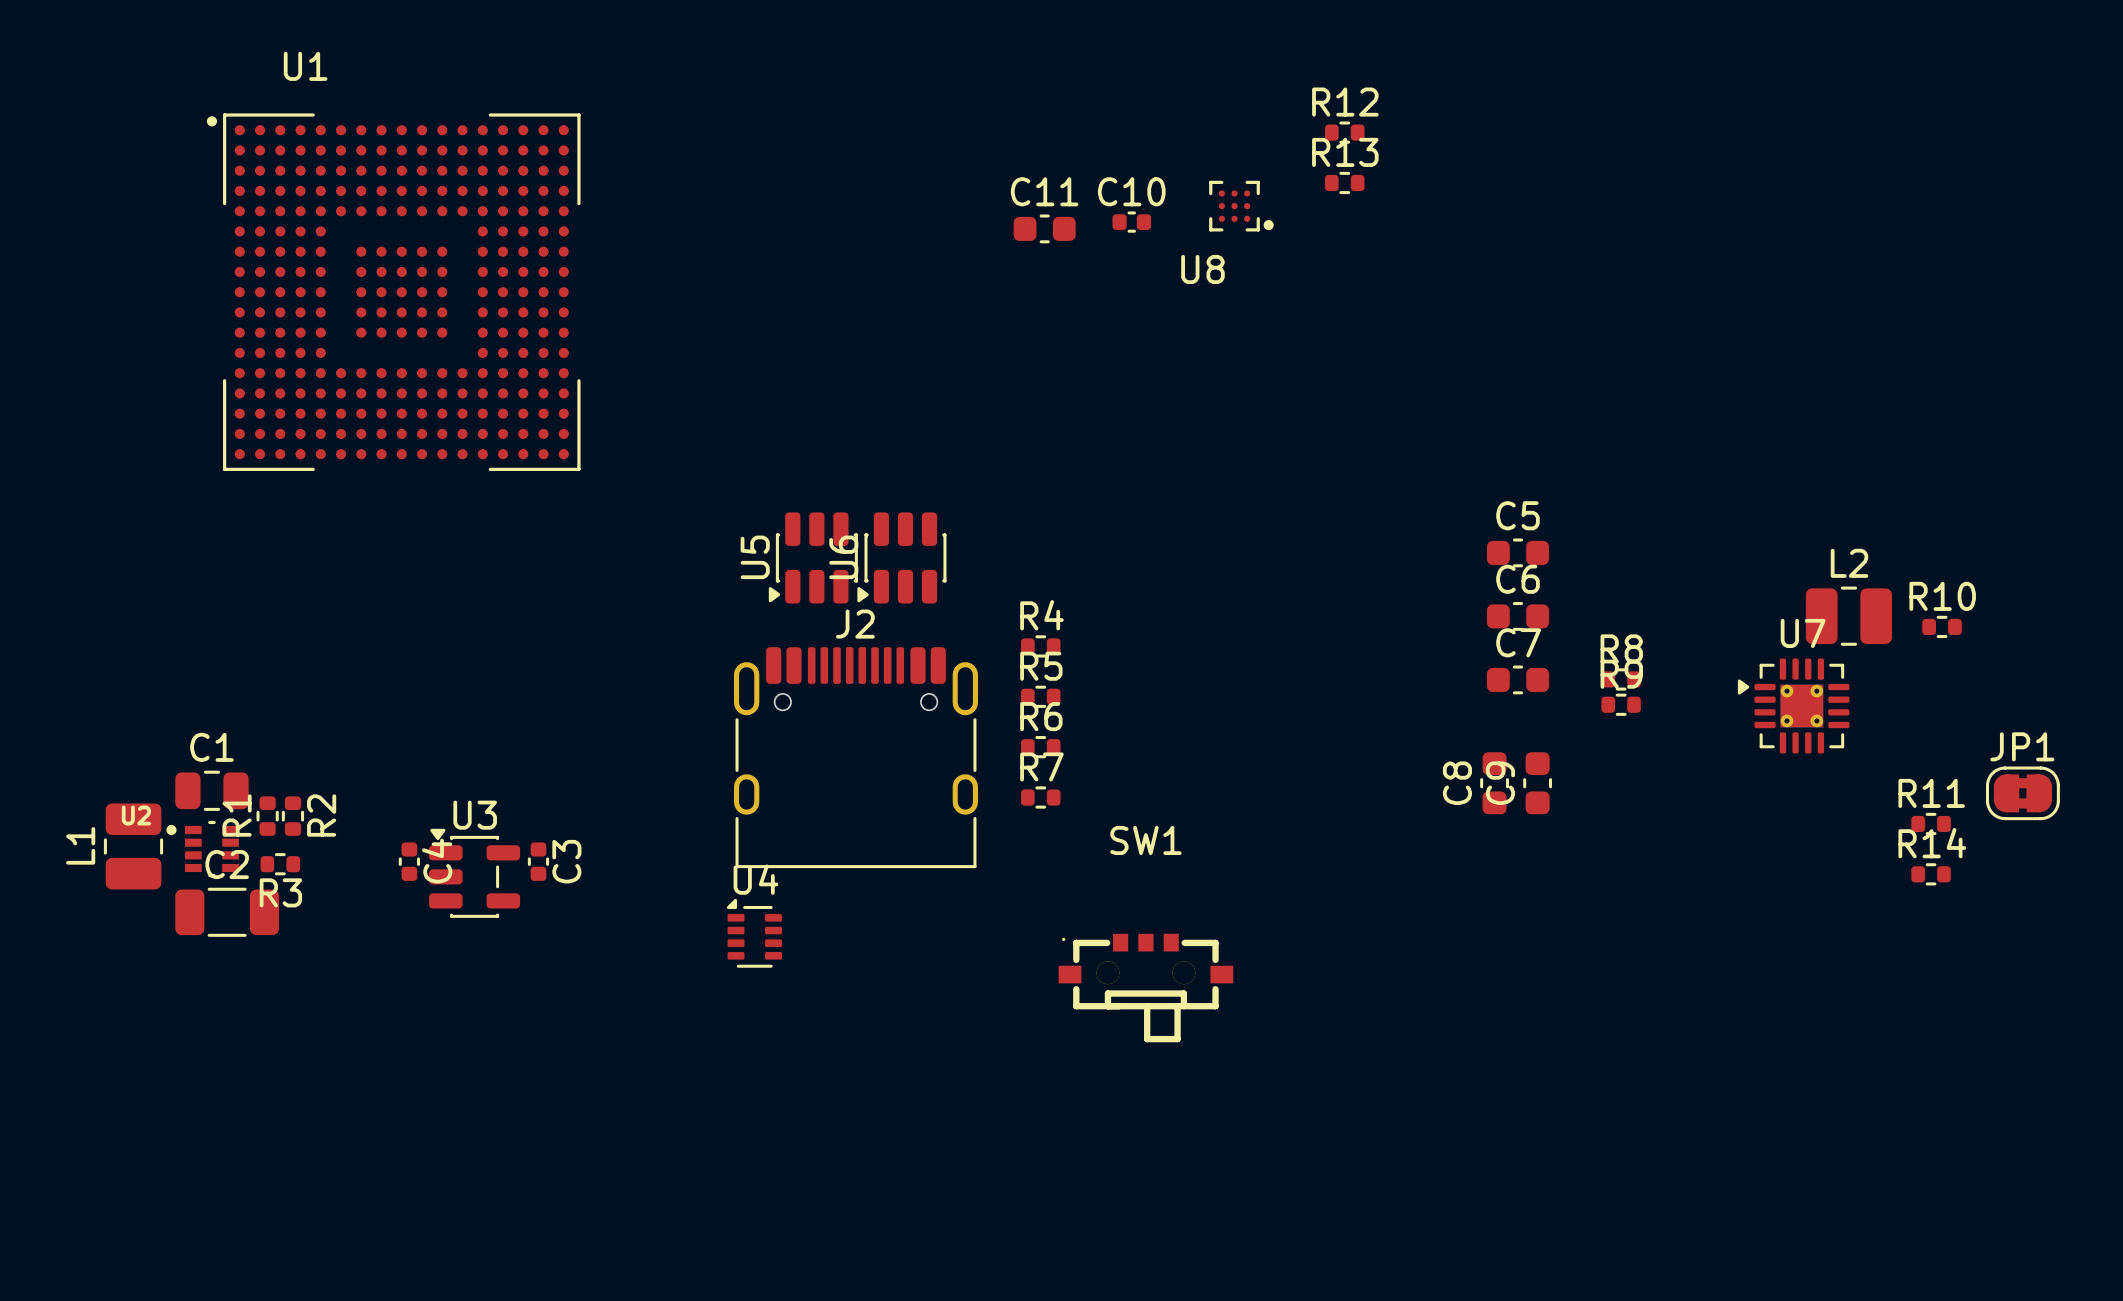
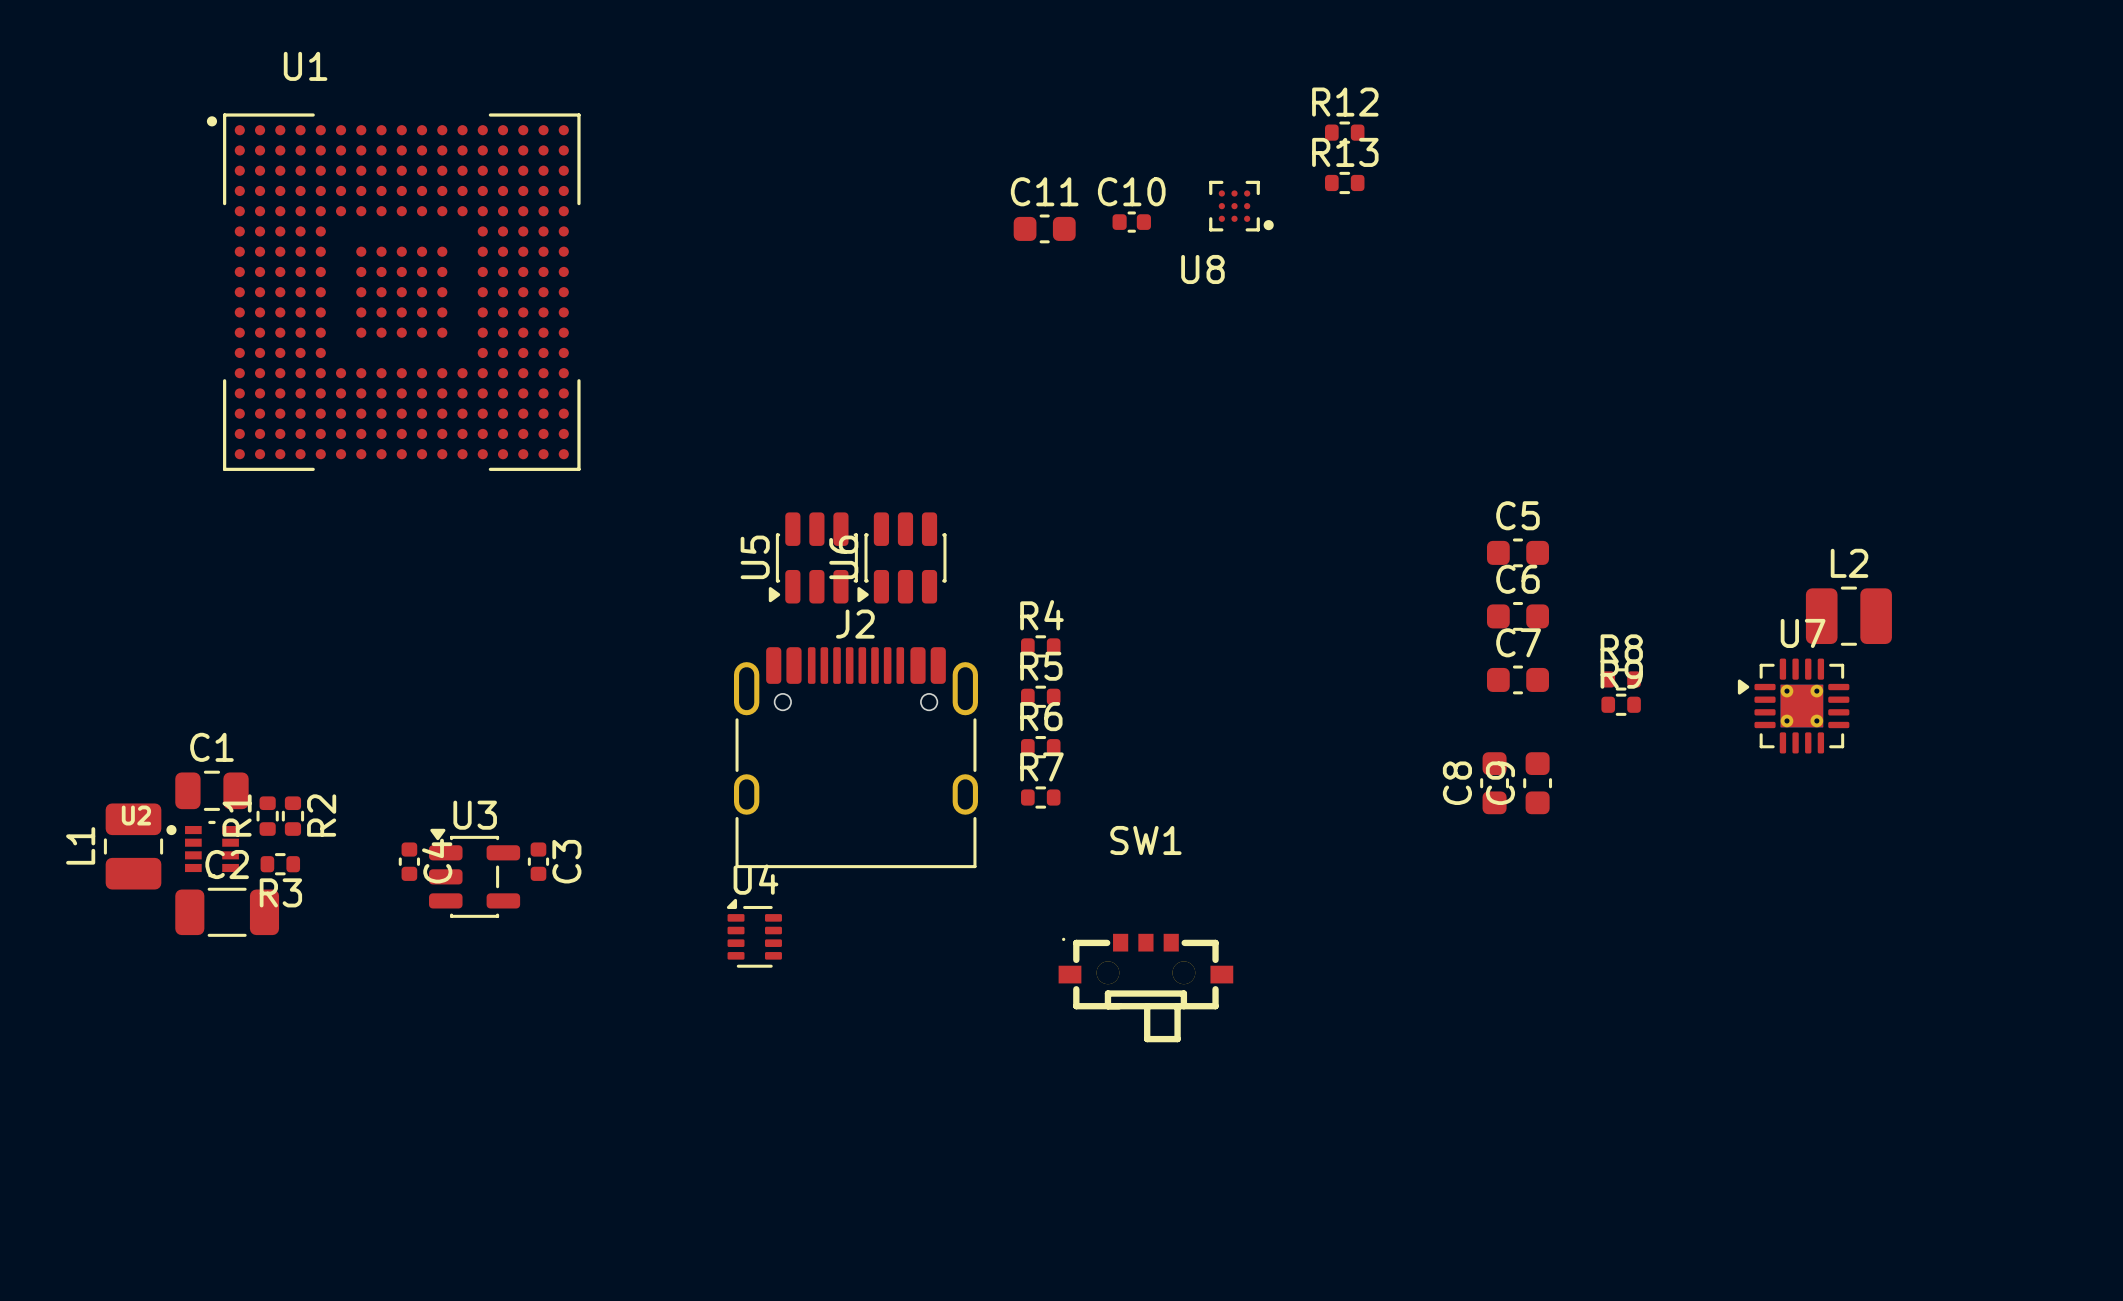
R10: (1942, 626) -> none
JP1: (2022, 793) -> none
R11: (1931, 823) -> none
R14: (1931, 874) -> none

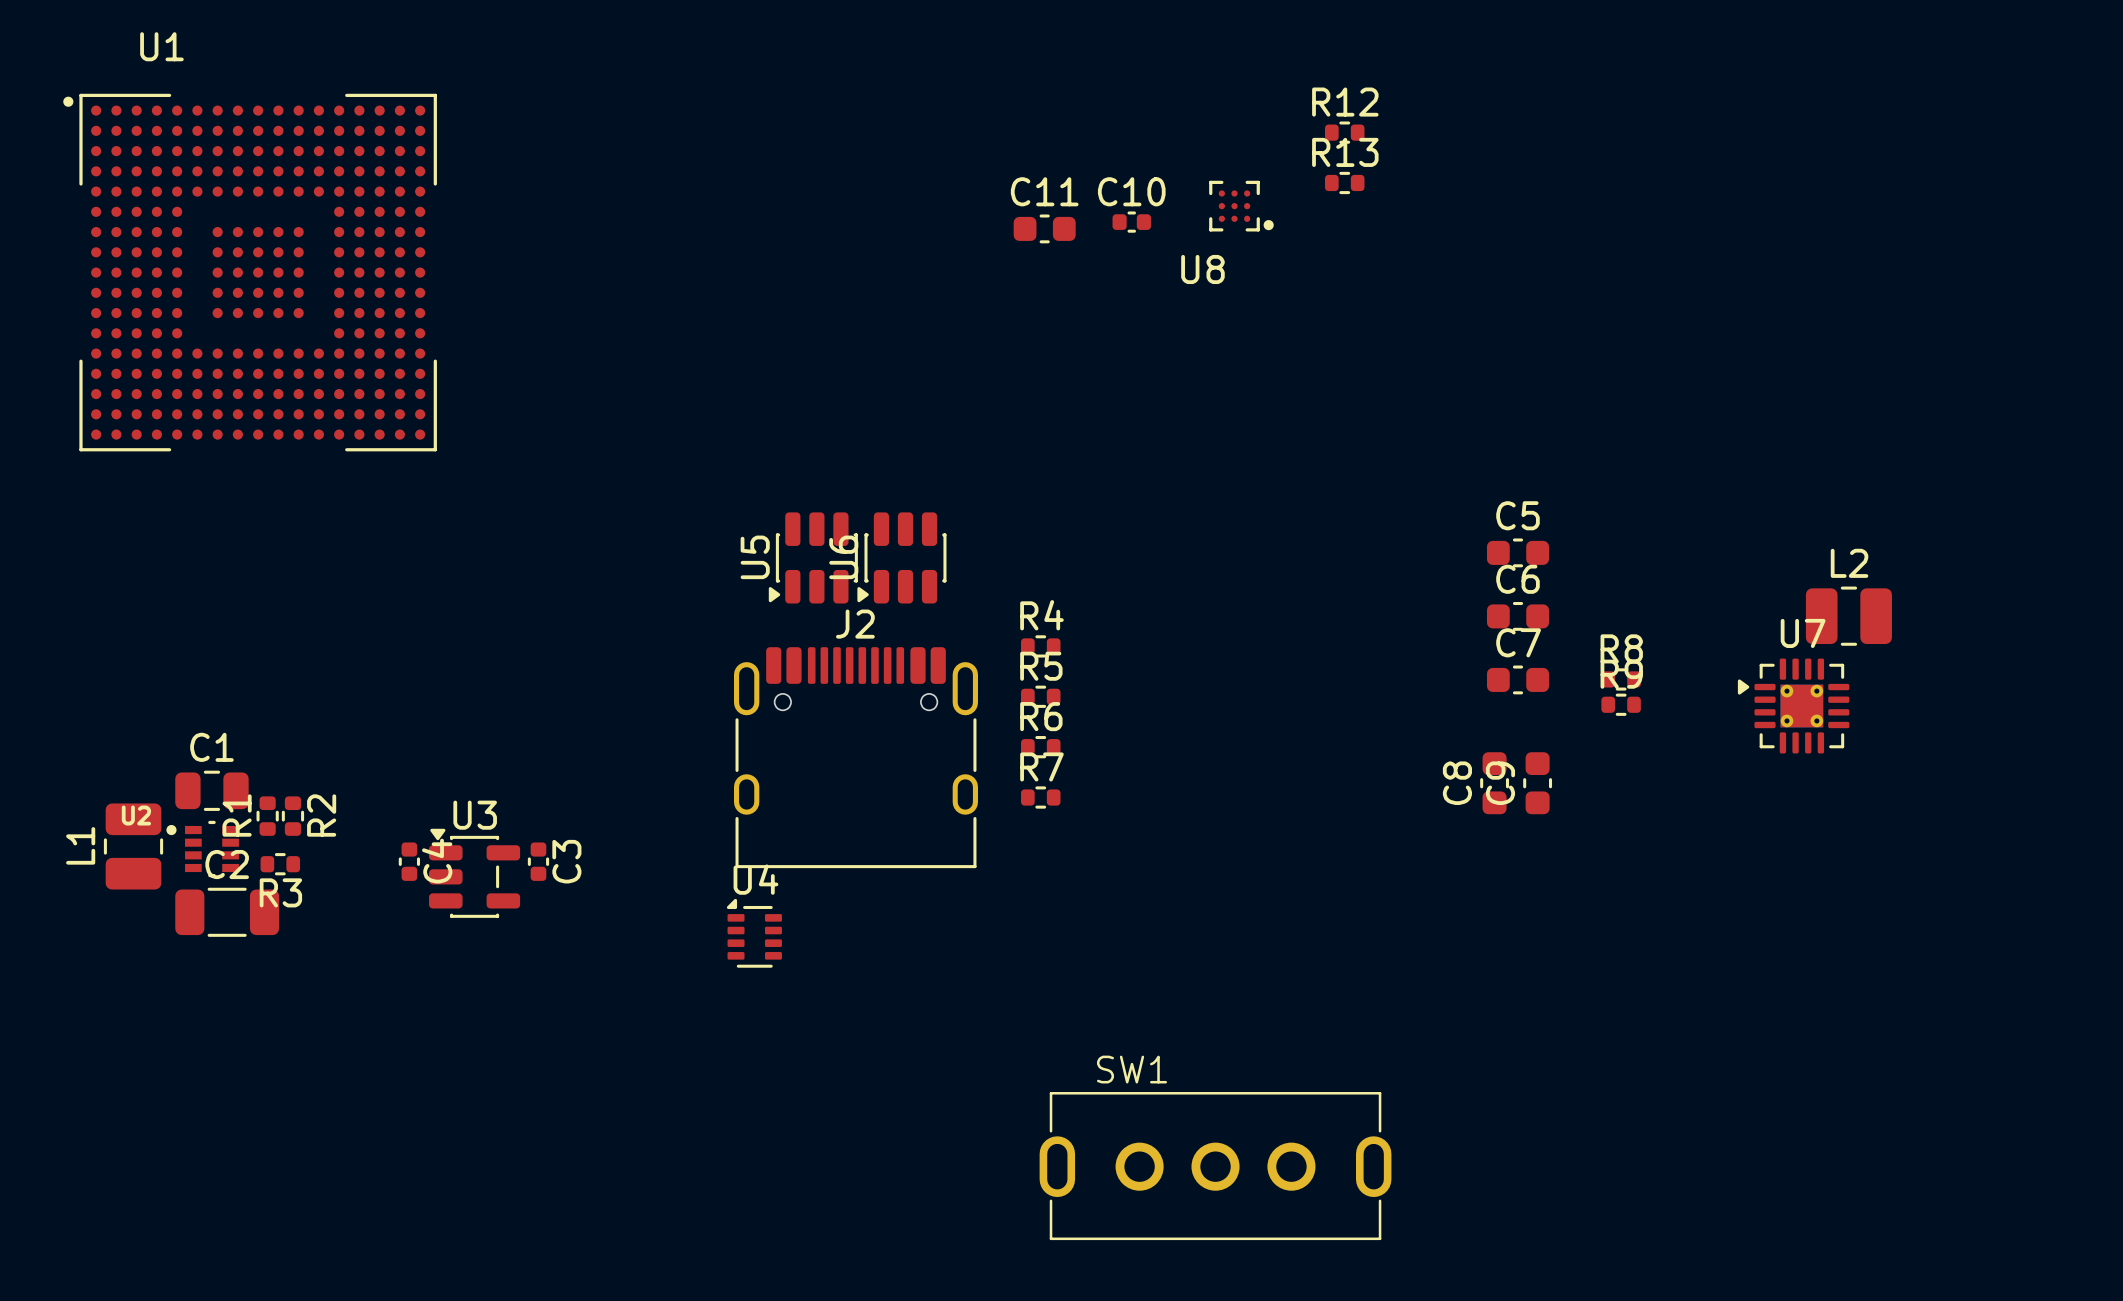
U1 position: (393, 292) -> (250, 272)
SW1 name position: SW1 (1145, 840) -> SW1 (1132, 1069)
SW1 footprint: [1058, 933, 1234, 1043] -> [1039, 1092, 1392, 1241]

